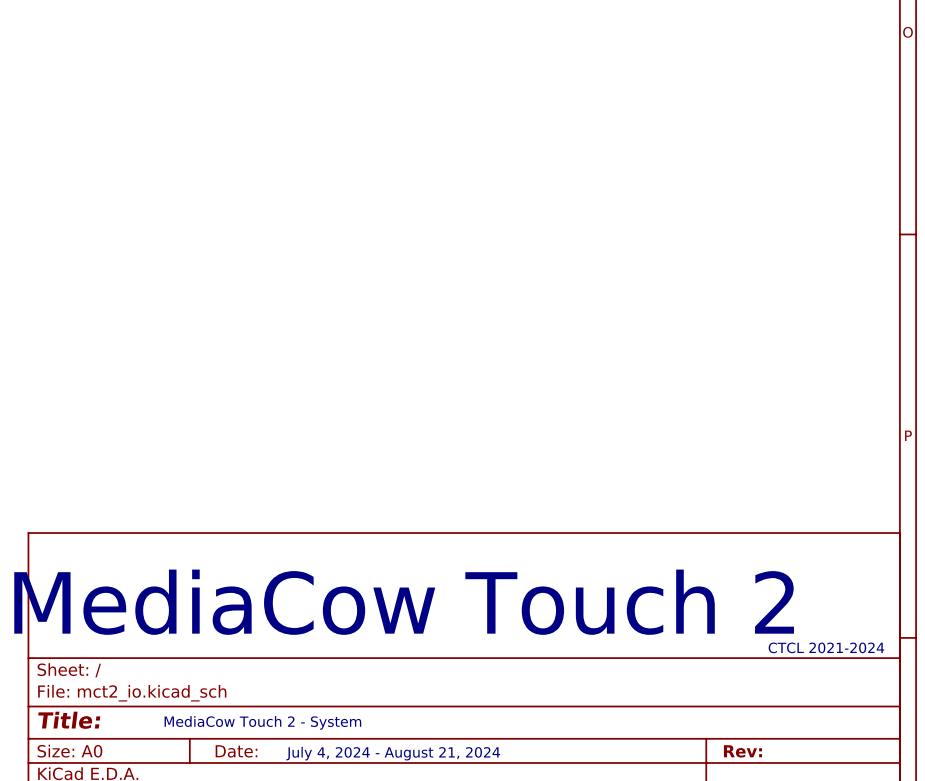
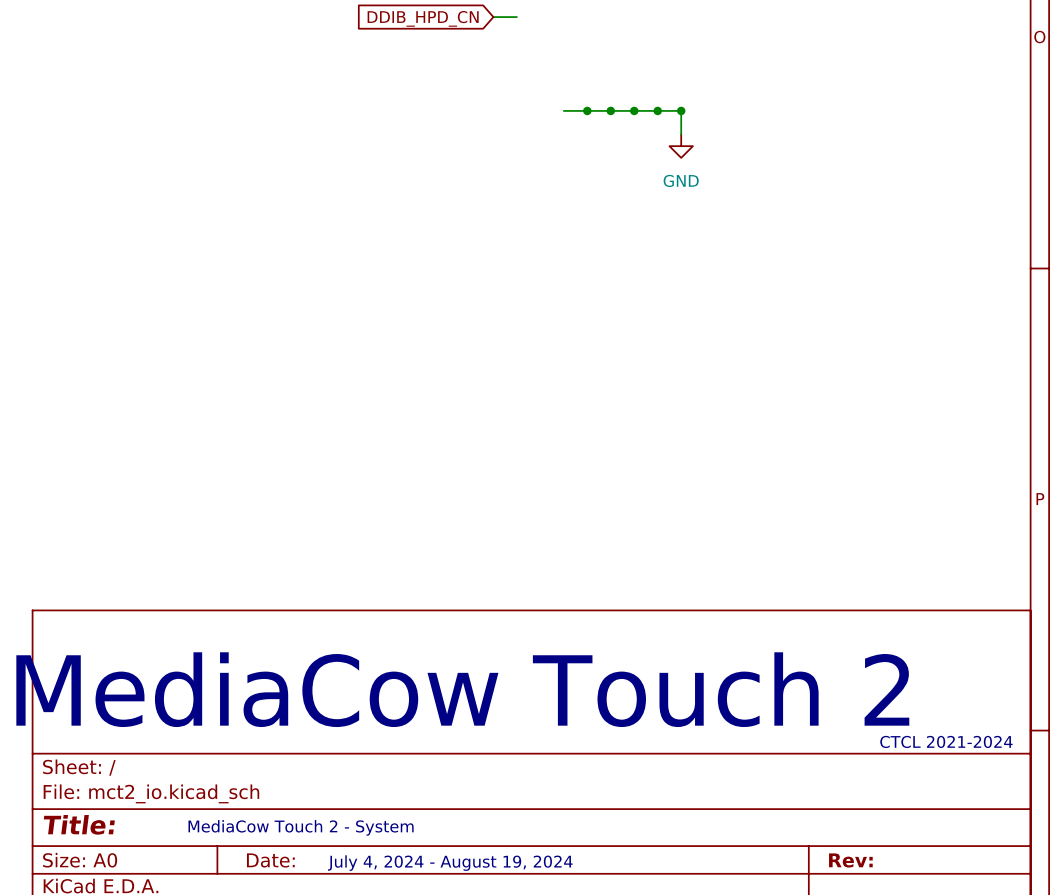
wire: none -> (493, 17) (516, 17)
global label: none -> DDIB_HPD_CN (423, 18)
wire: none -> (563, 110) (681, 110) (681, 134)
junction: none -> (587, 110)
junction: none -> (610, 110)
junction: none -> (634, 110)
junction: none -> (657, 110)
junction: none -> (681, 110)
power symbol: none -> GND (681, 146)
text: July 4, 2024 - August 21, 2024 (393, 753) -> July 4, 2024 - August 19, 2024 (450, 863)

